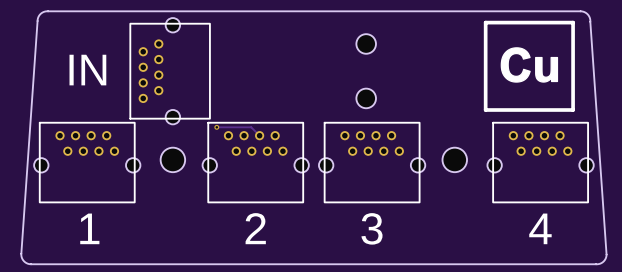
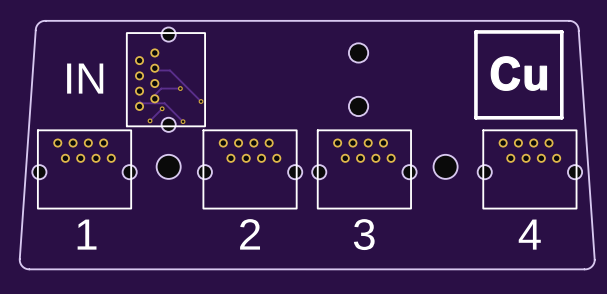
track: none -> (154, 70) (170, 70) (201, 101)
track: none -> (180, 88) (161, 88) (154, 95)
via: none -> (180, 88)
track: none -> (139, 101) (141, 103) (164, 103) (183, 121)
via: none -> (201, 101)
track: none -> (162, 108) (150, 120)
via: none -> (162, 108)
via: none -> (150, 120)
via: none -> (183, 121)
track: (216, 127) (251, 127) (259, 135) -> none
via: (216, 127) -> none

